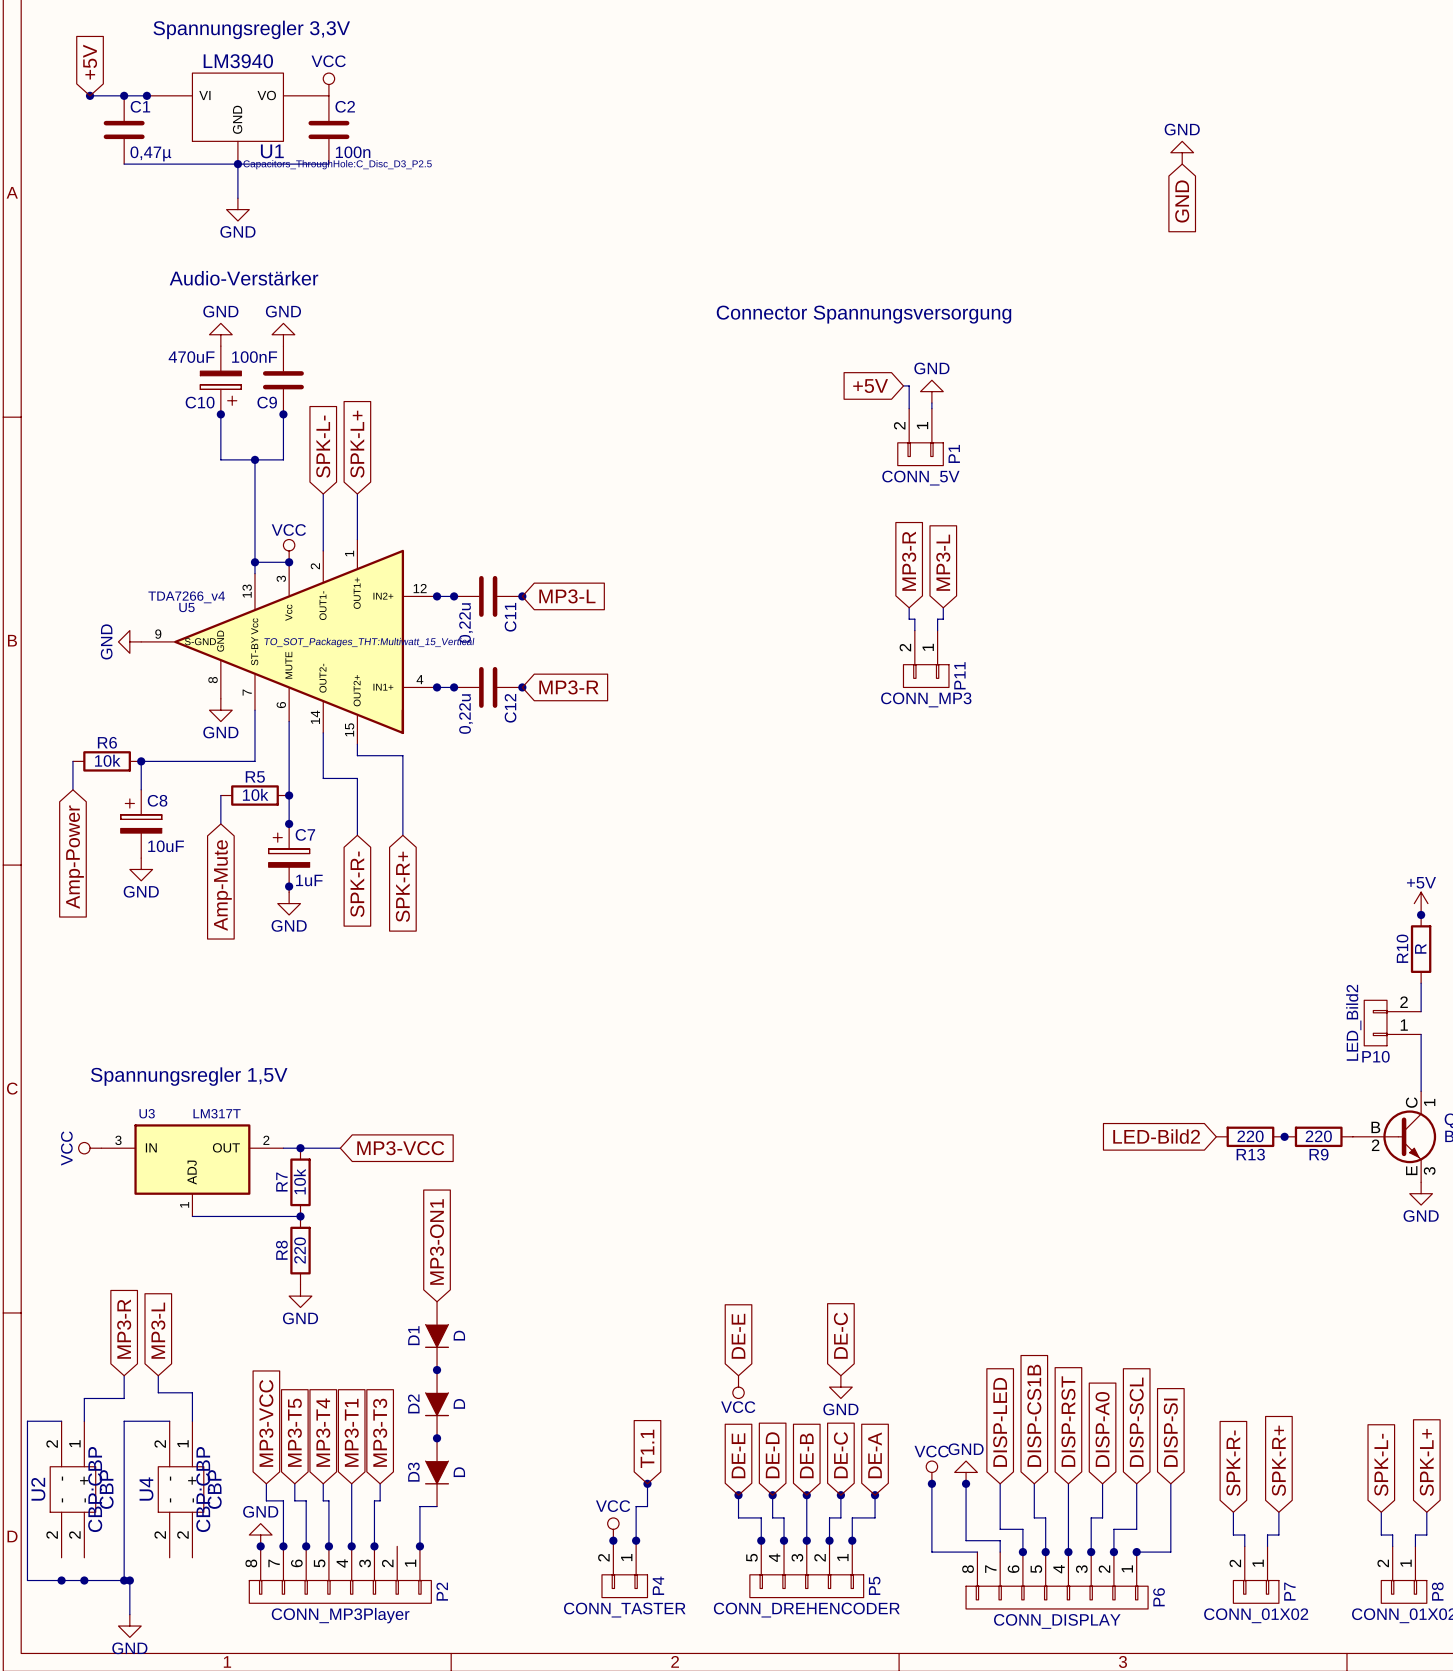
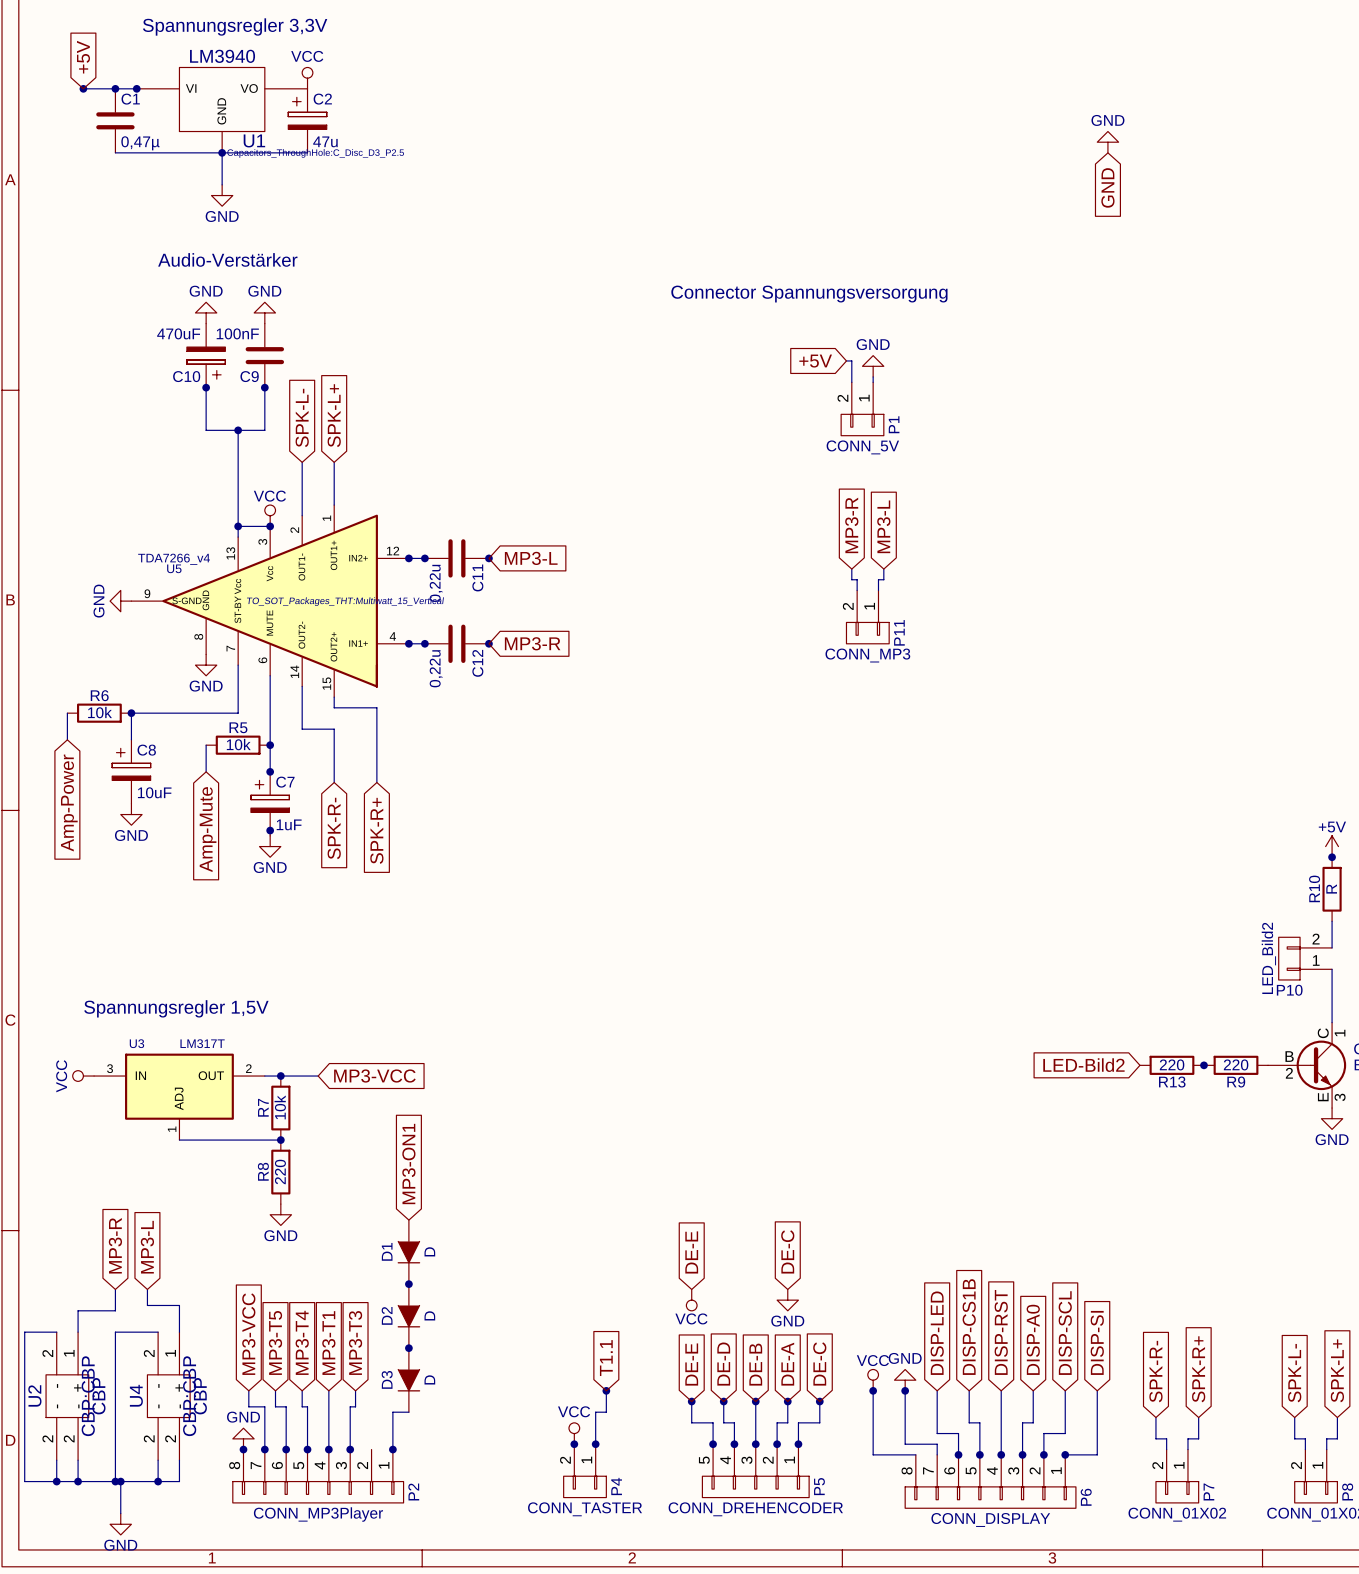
C2 symbol: [308, 95, 350, 165] -> [288, 88, 327, 153]
C2 value: 100n (353, 152) -> 47u (325, 141)
global label: DE-C (840, 1455) -> DE-A (787, 1364)
global label: DE-A (875, 1455) -> DE-C (819, 1363)
wire: none -> (56, 1460) (56, 1481)
wire: none -> (78, 1460) (78, 1481)
wire: none -> (158, 1460) (158, 1481)
wire: none -> (179, 1460) (179, 1481) (120, 1481)
junction: none -> (158, 1481)

